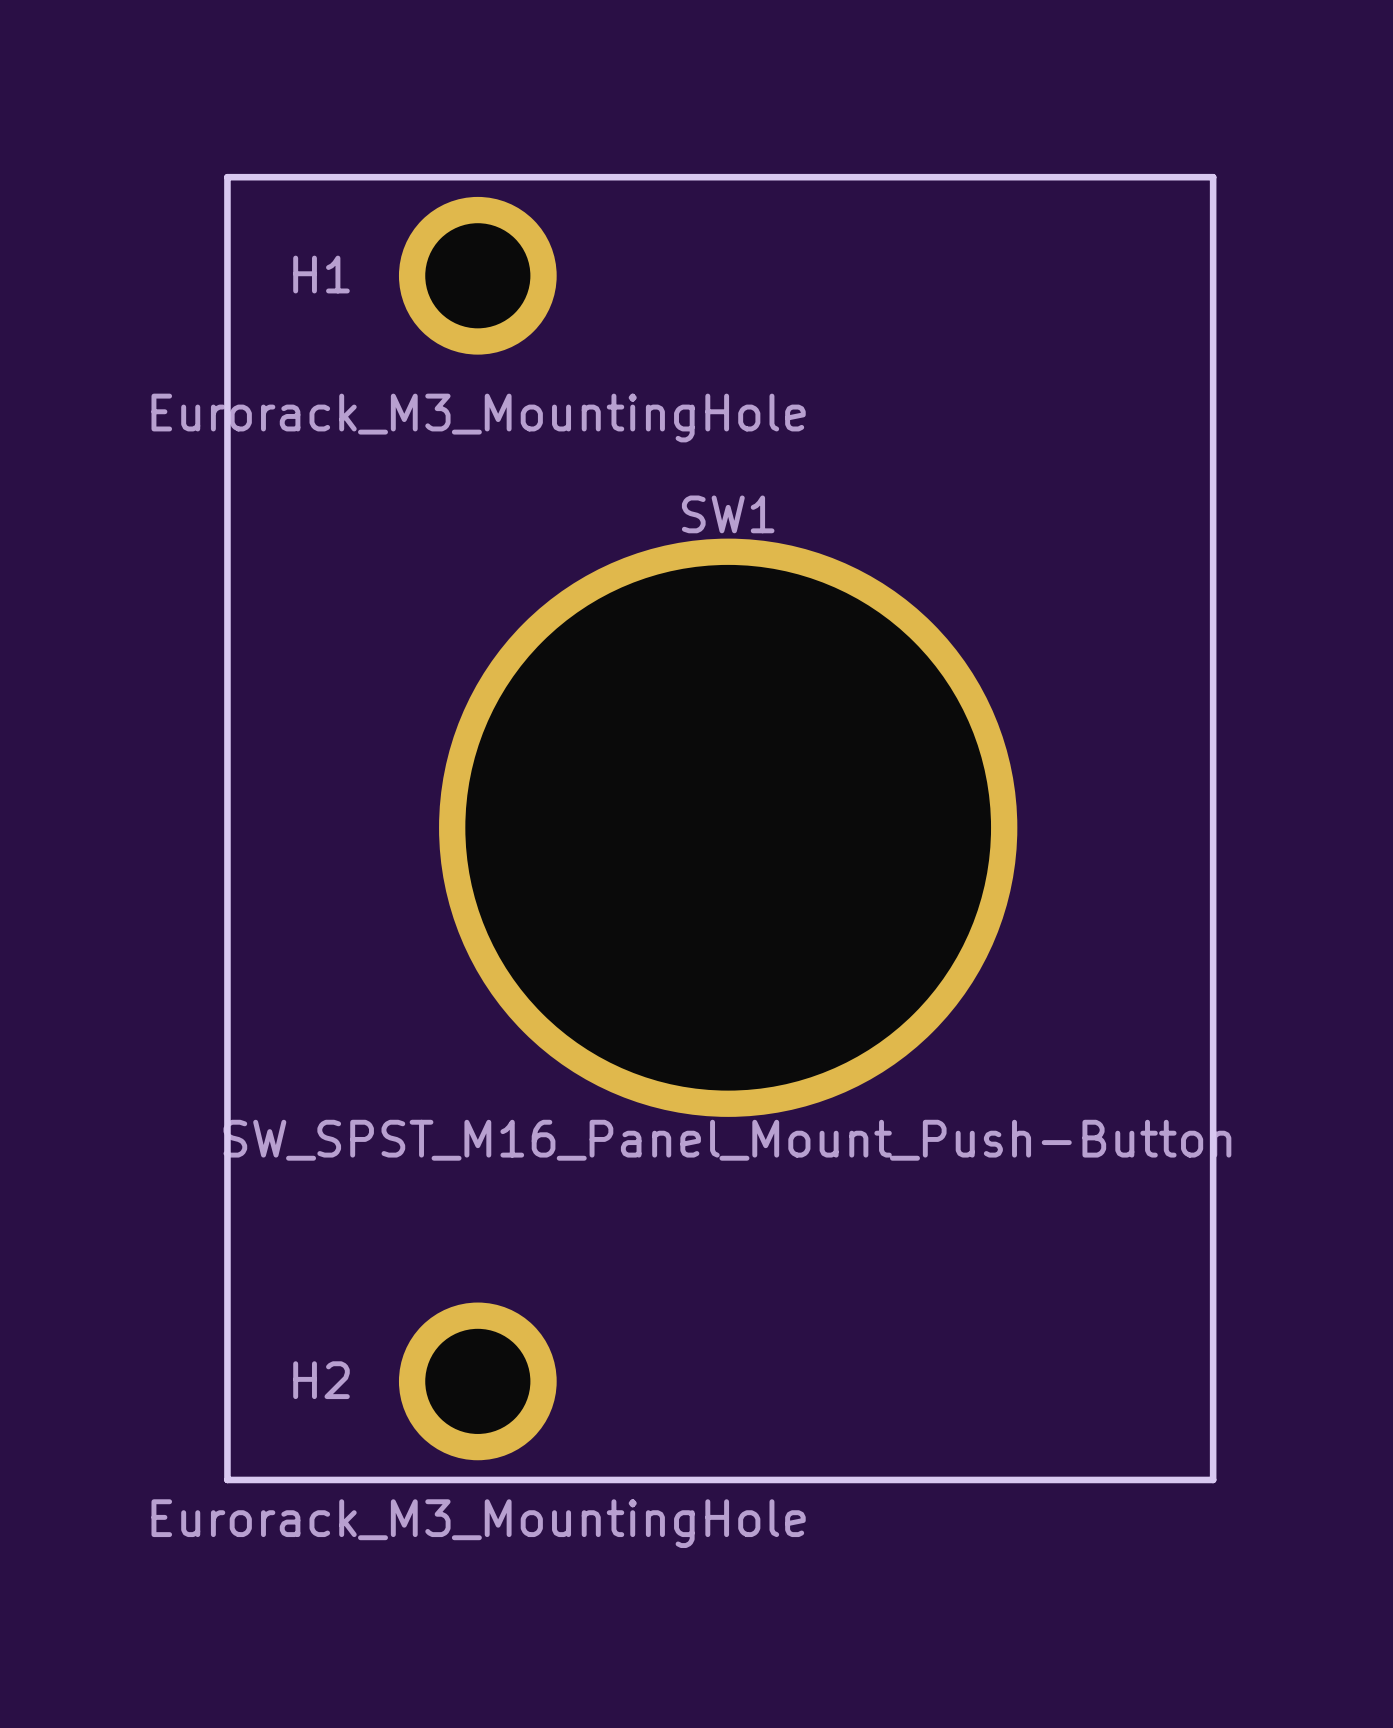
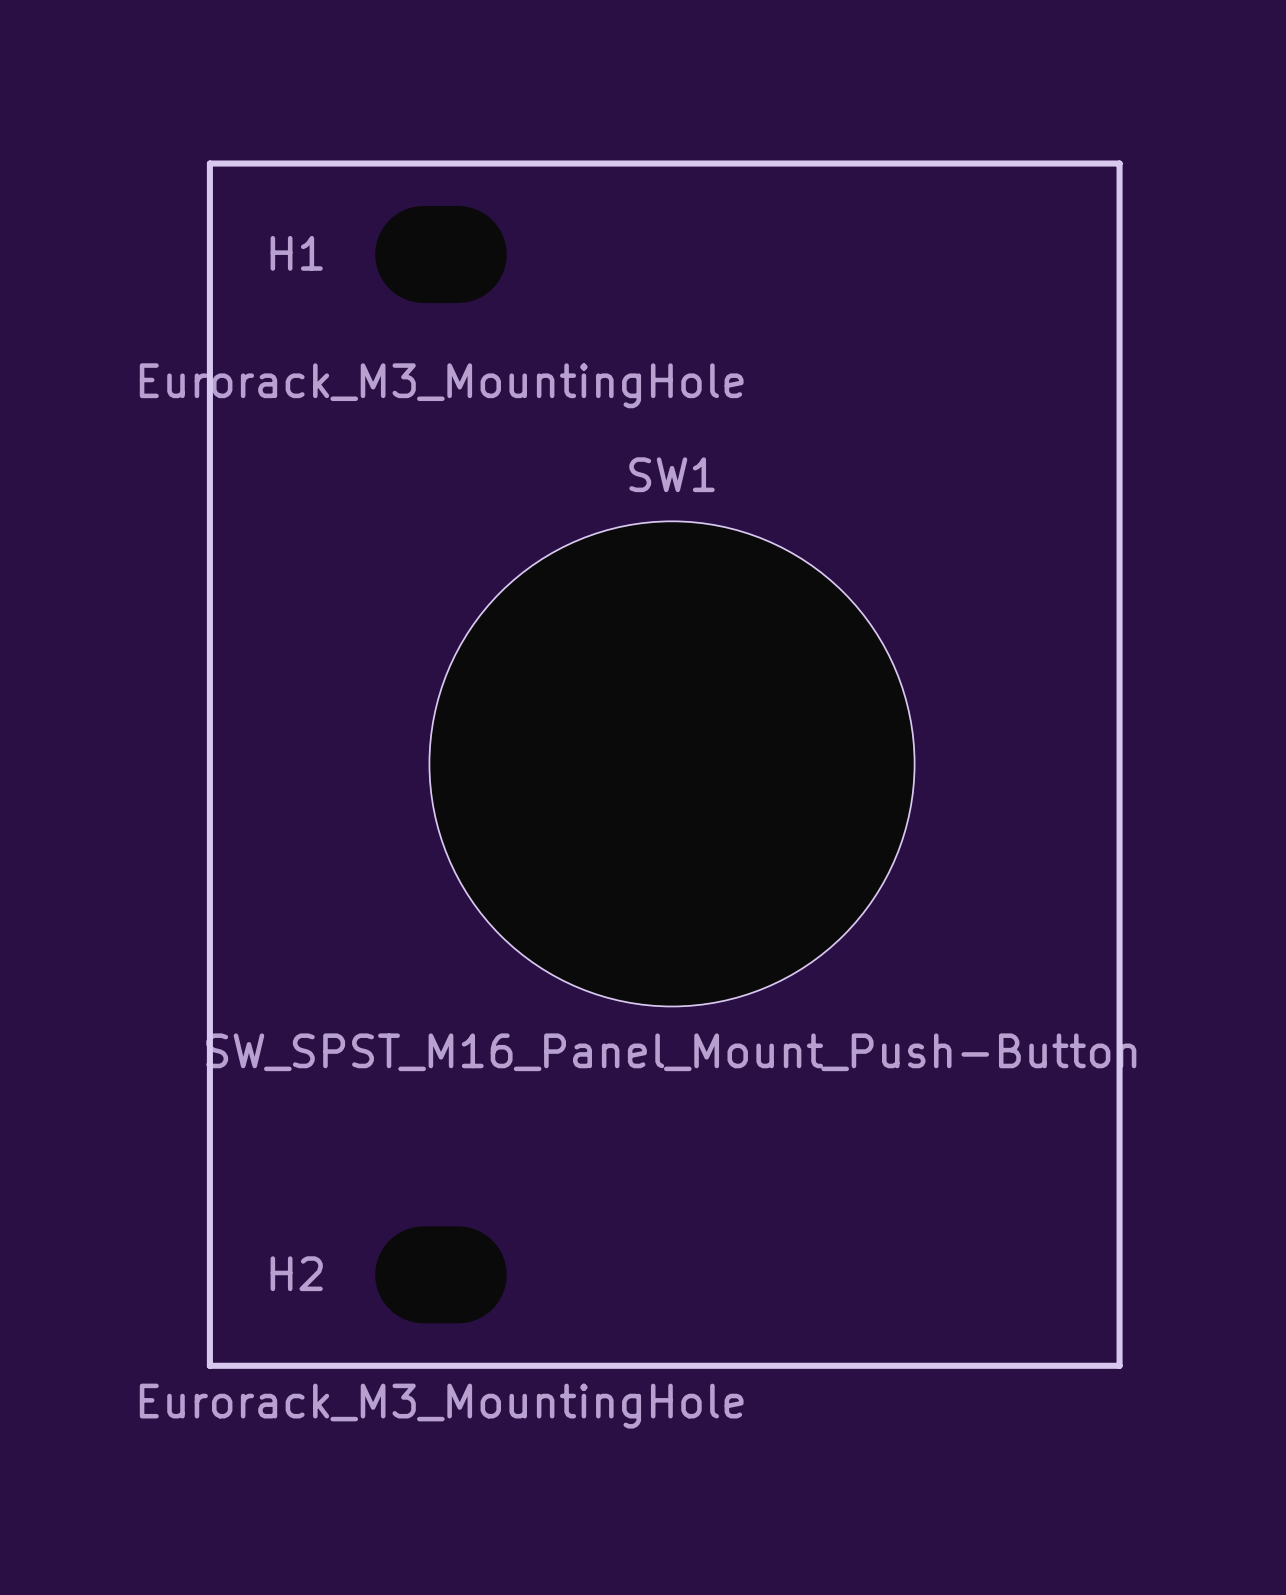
H1 footprint: [398, 196, 557, 355] -> [375, 205, 507, 304]
SW1 footprint: [439, 538, 1018, 1117] -> [429, 521, 915, 1007]
H2 footprint: [398, 1302, 557, 1461] -> [375, 1226, 507, 1324]

